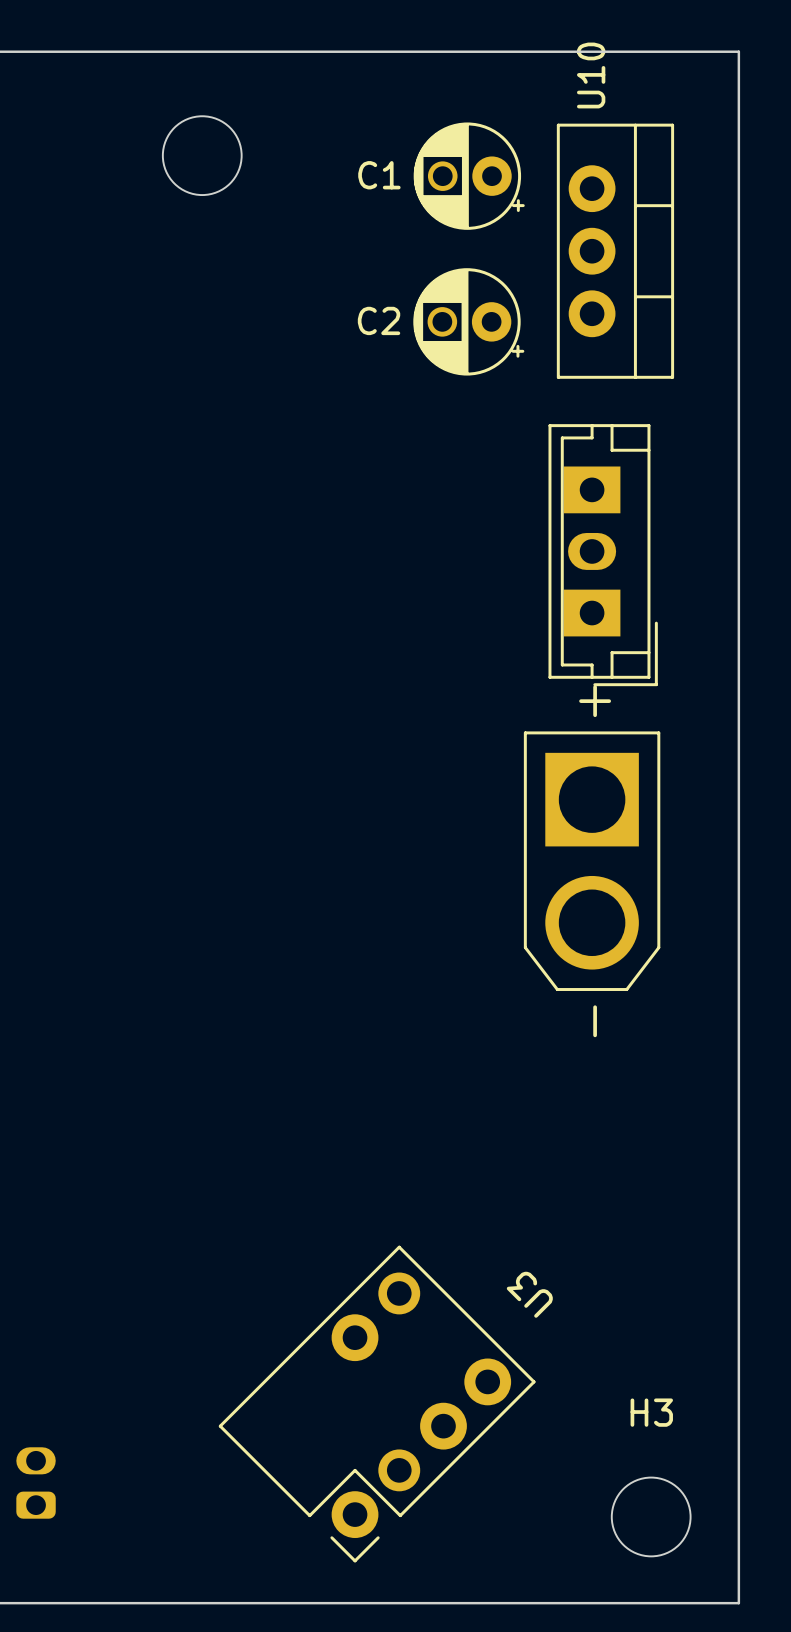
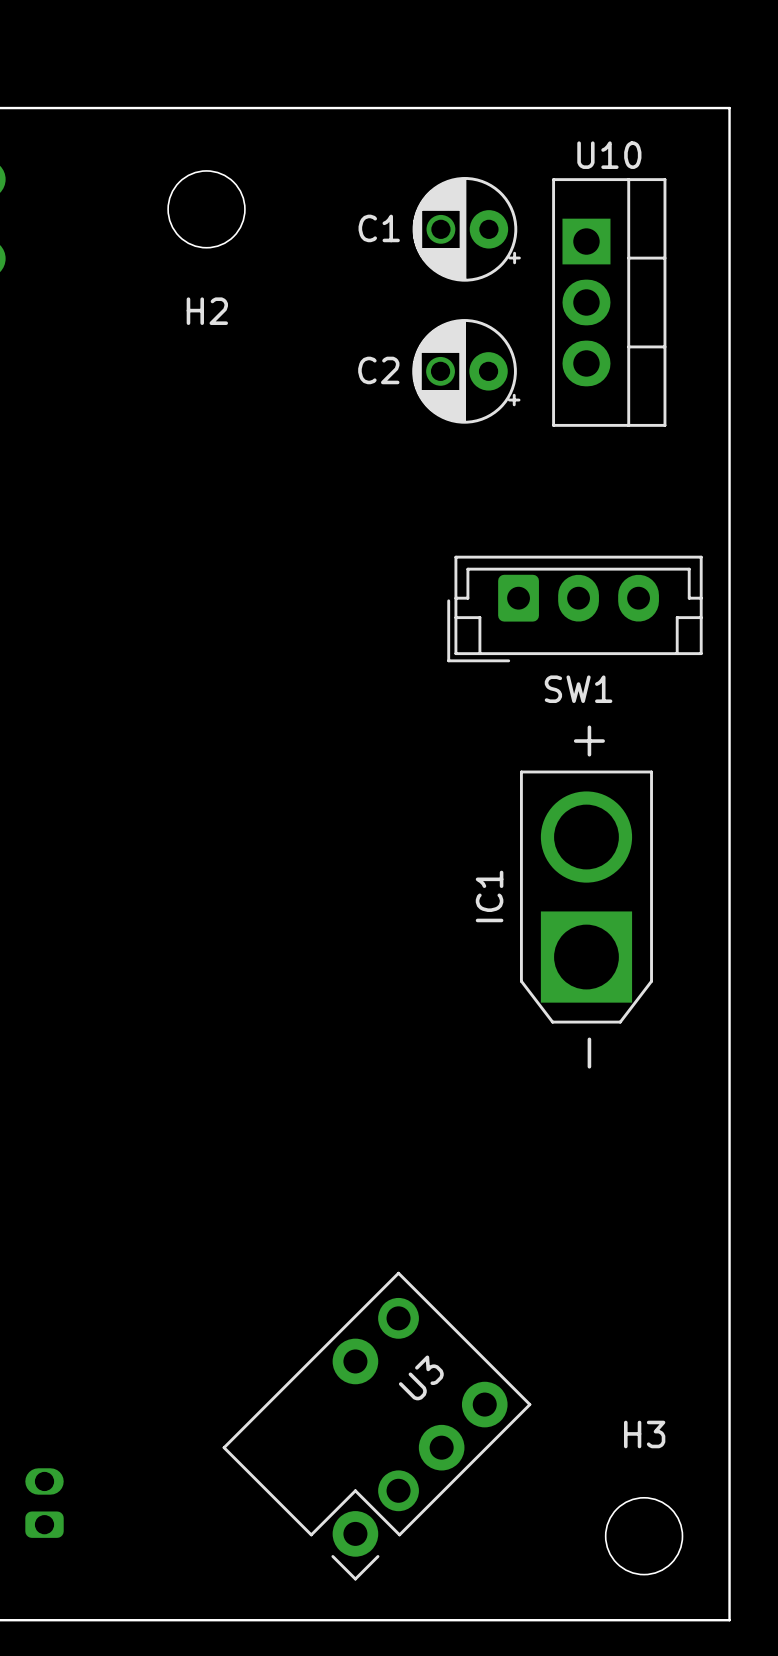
U10 footprint: [556, 123, 675, 379] -> [552, 178, 667, 427]
H2 name: none -> H2 (207, 311)
part: (603, 555) -> none
SW1: none -> (574, 608)
part: (592, 861) -> none
IC1: none -> (586, 897)
U3 name rotation: 0° (529, 1294) -> 90° clockwise (421, 1377)
U3 name position: U3 (529, 1294) -> U3 (421, 1377)

